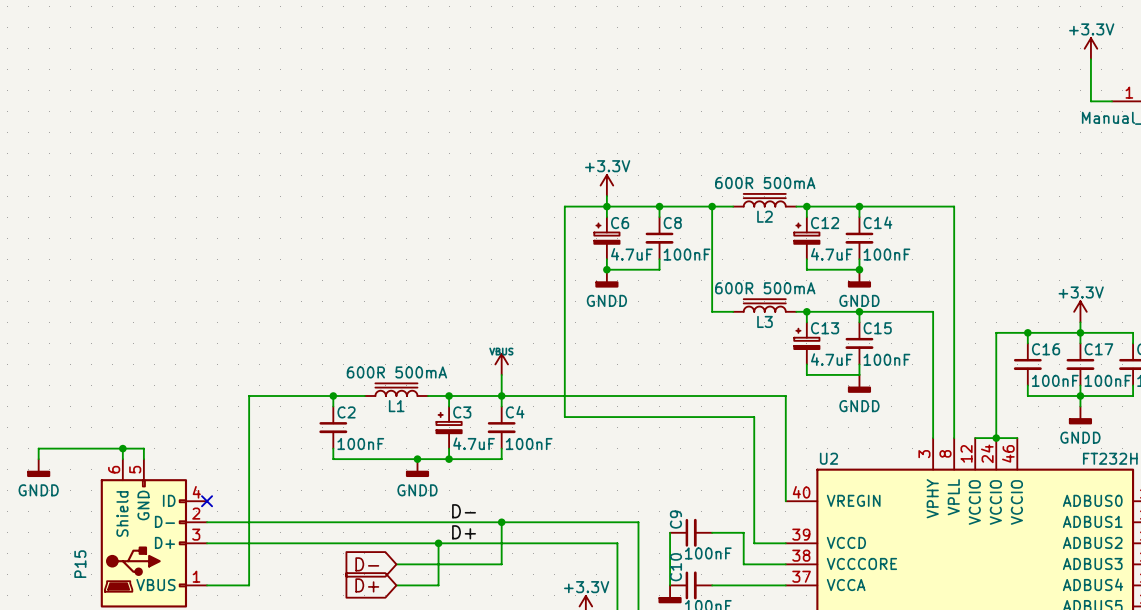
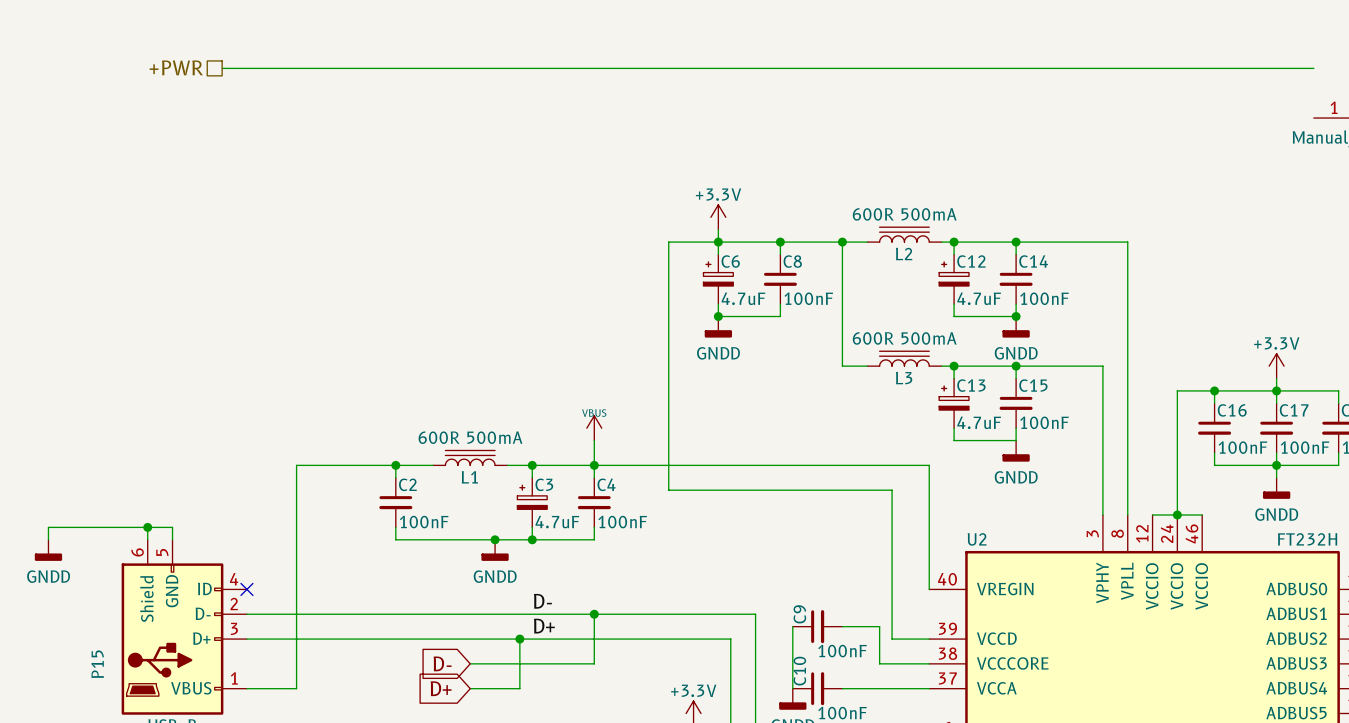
power symbol: +3.3V (1090, 48) -> none
hierarchical label: none -> +PWR (176, 67)
wire: none -> (222, 68) (1313, 68)
wire: (1090, 59) (1090, 101) (1112, 101) -> none

